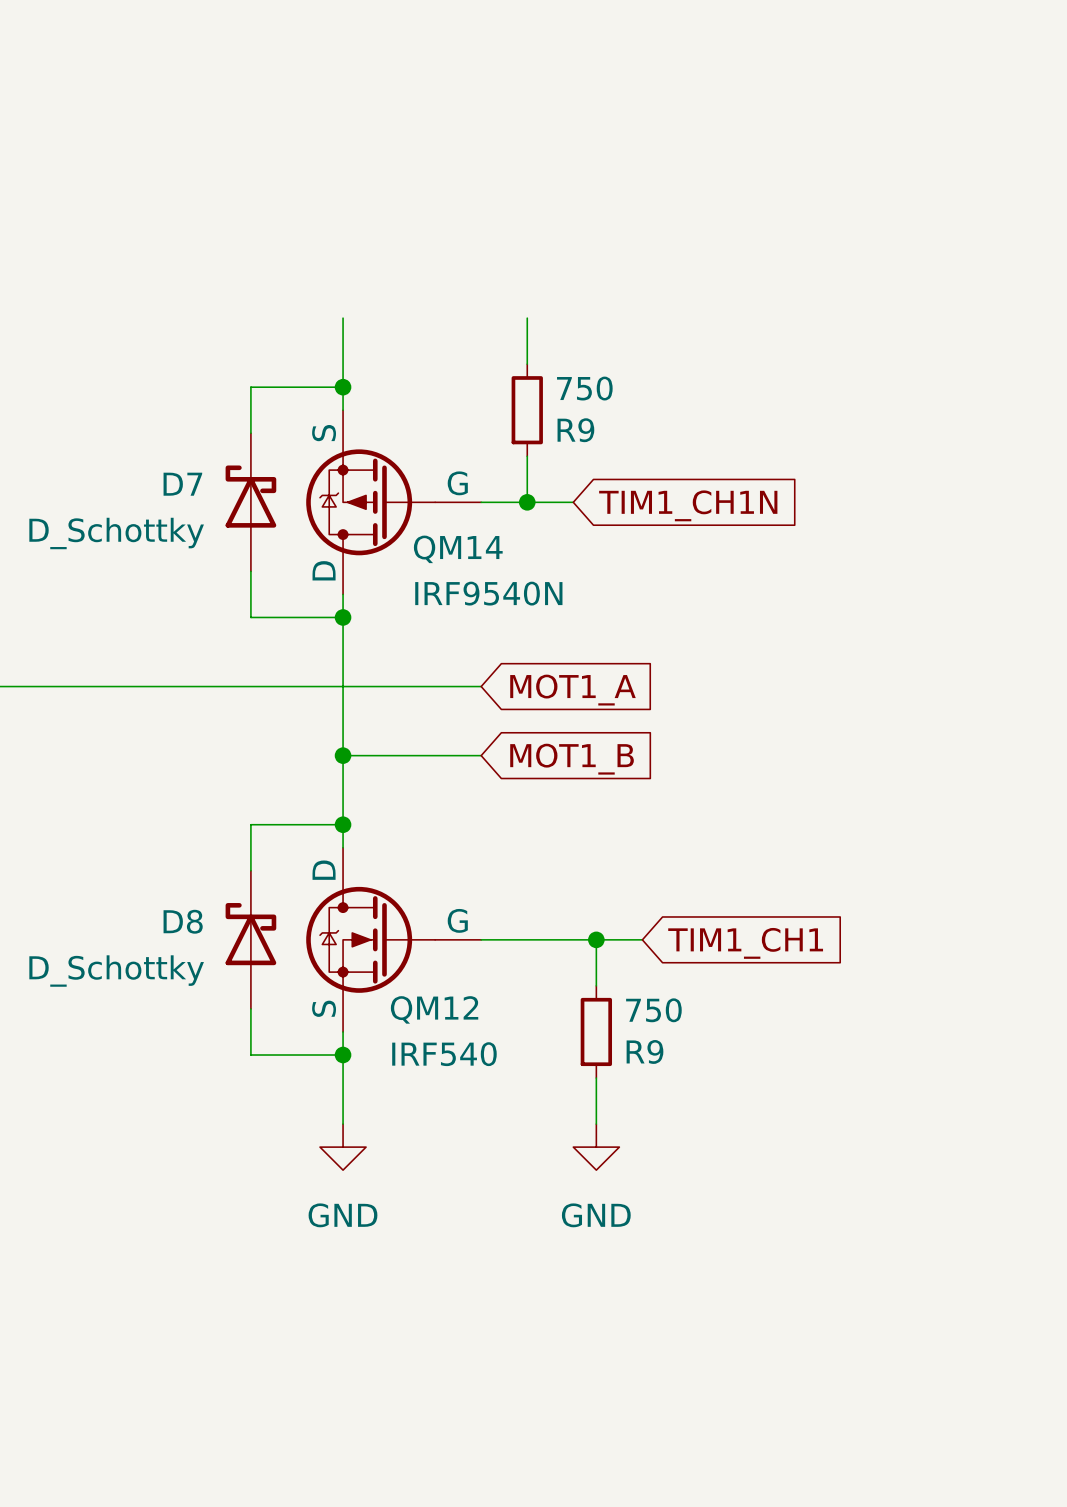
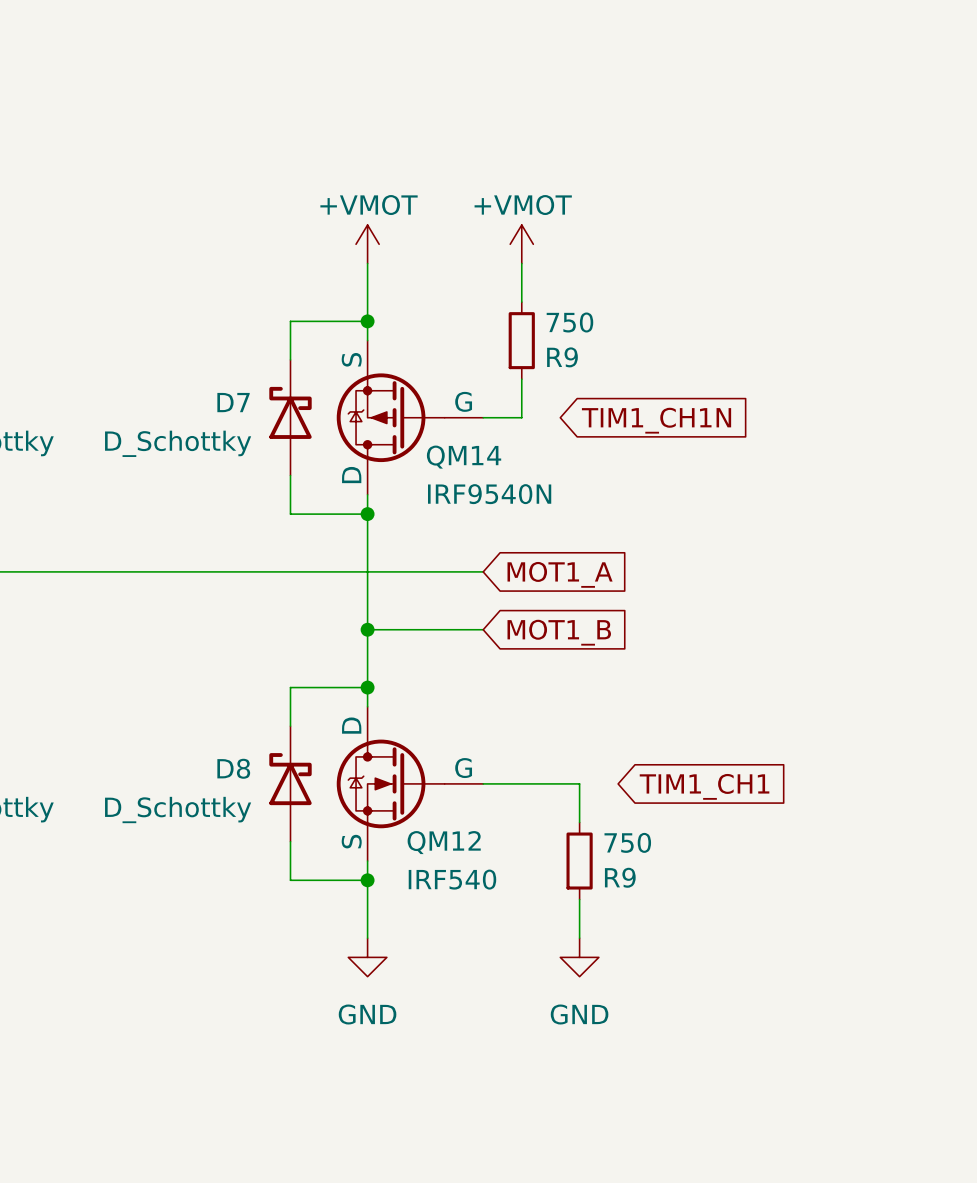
power symbol: none -> +VMOT (367, 244)
power symbol: none -> +VMOT (521, 244)
wire: (527, 502) (573, 502) -> none
junction: (527, 502) -> none
wire: (596, 939) (642, 939) -> none
junction: (596, 939) -> none

